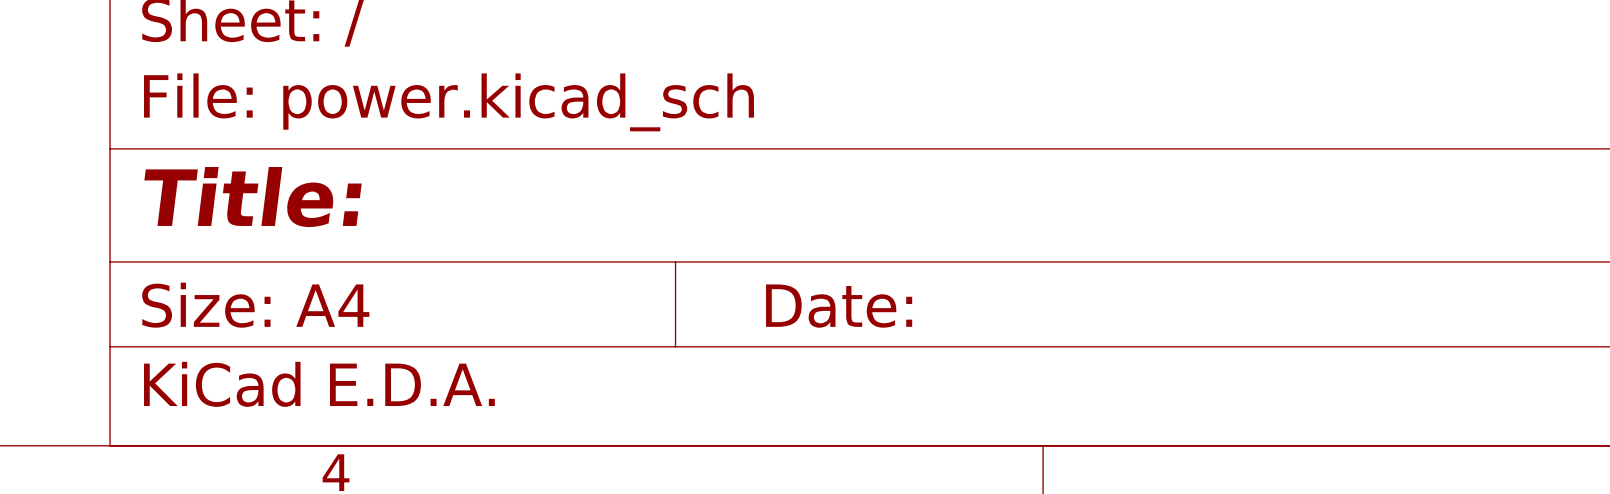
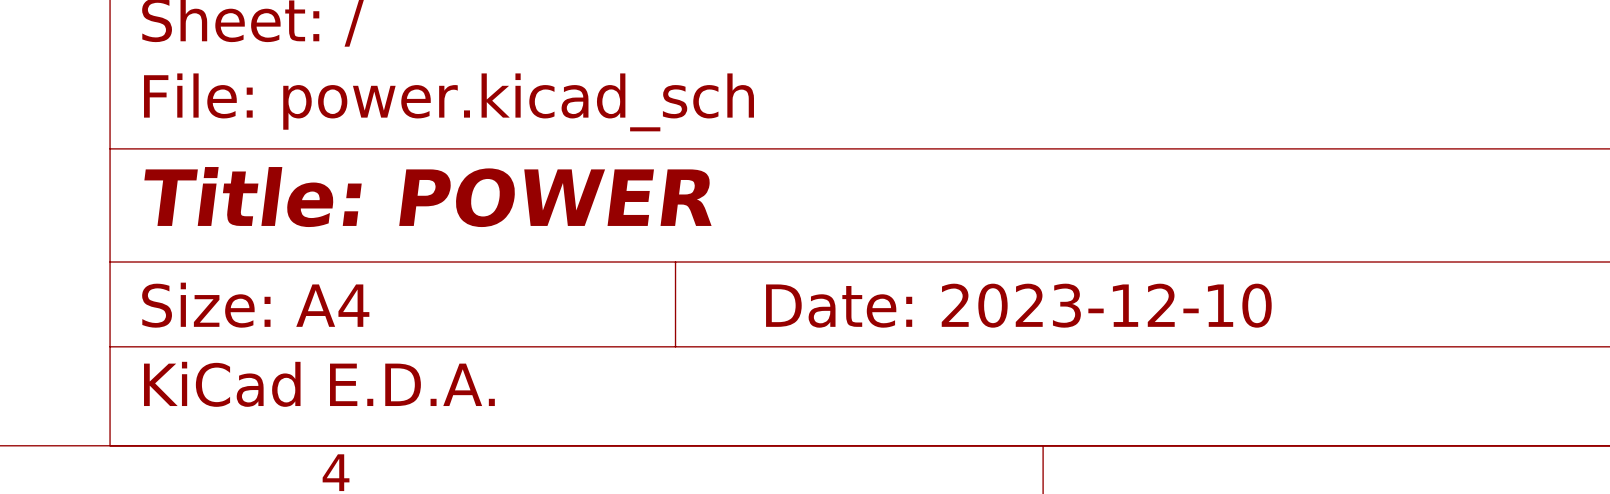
title block: Title: (253, 197) -> Title: POWER (427, 197)
title block: Date: (839, 306) -> Date: 2023-12-10 (1018, 305)

